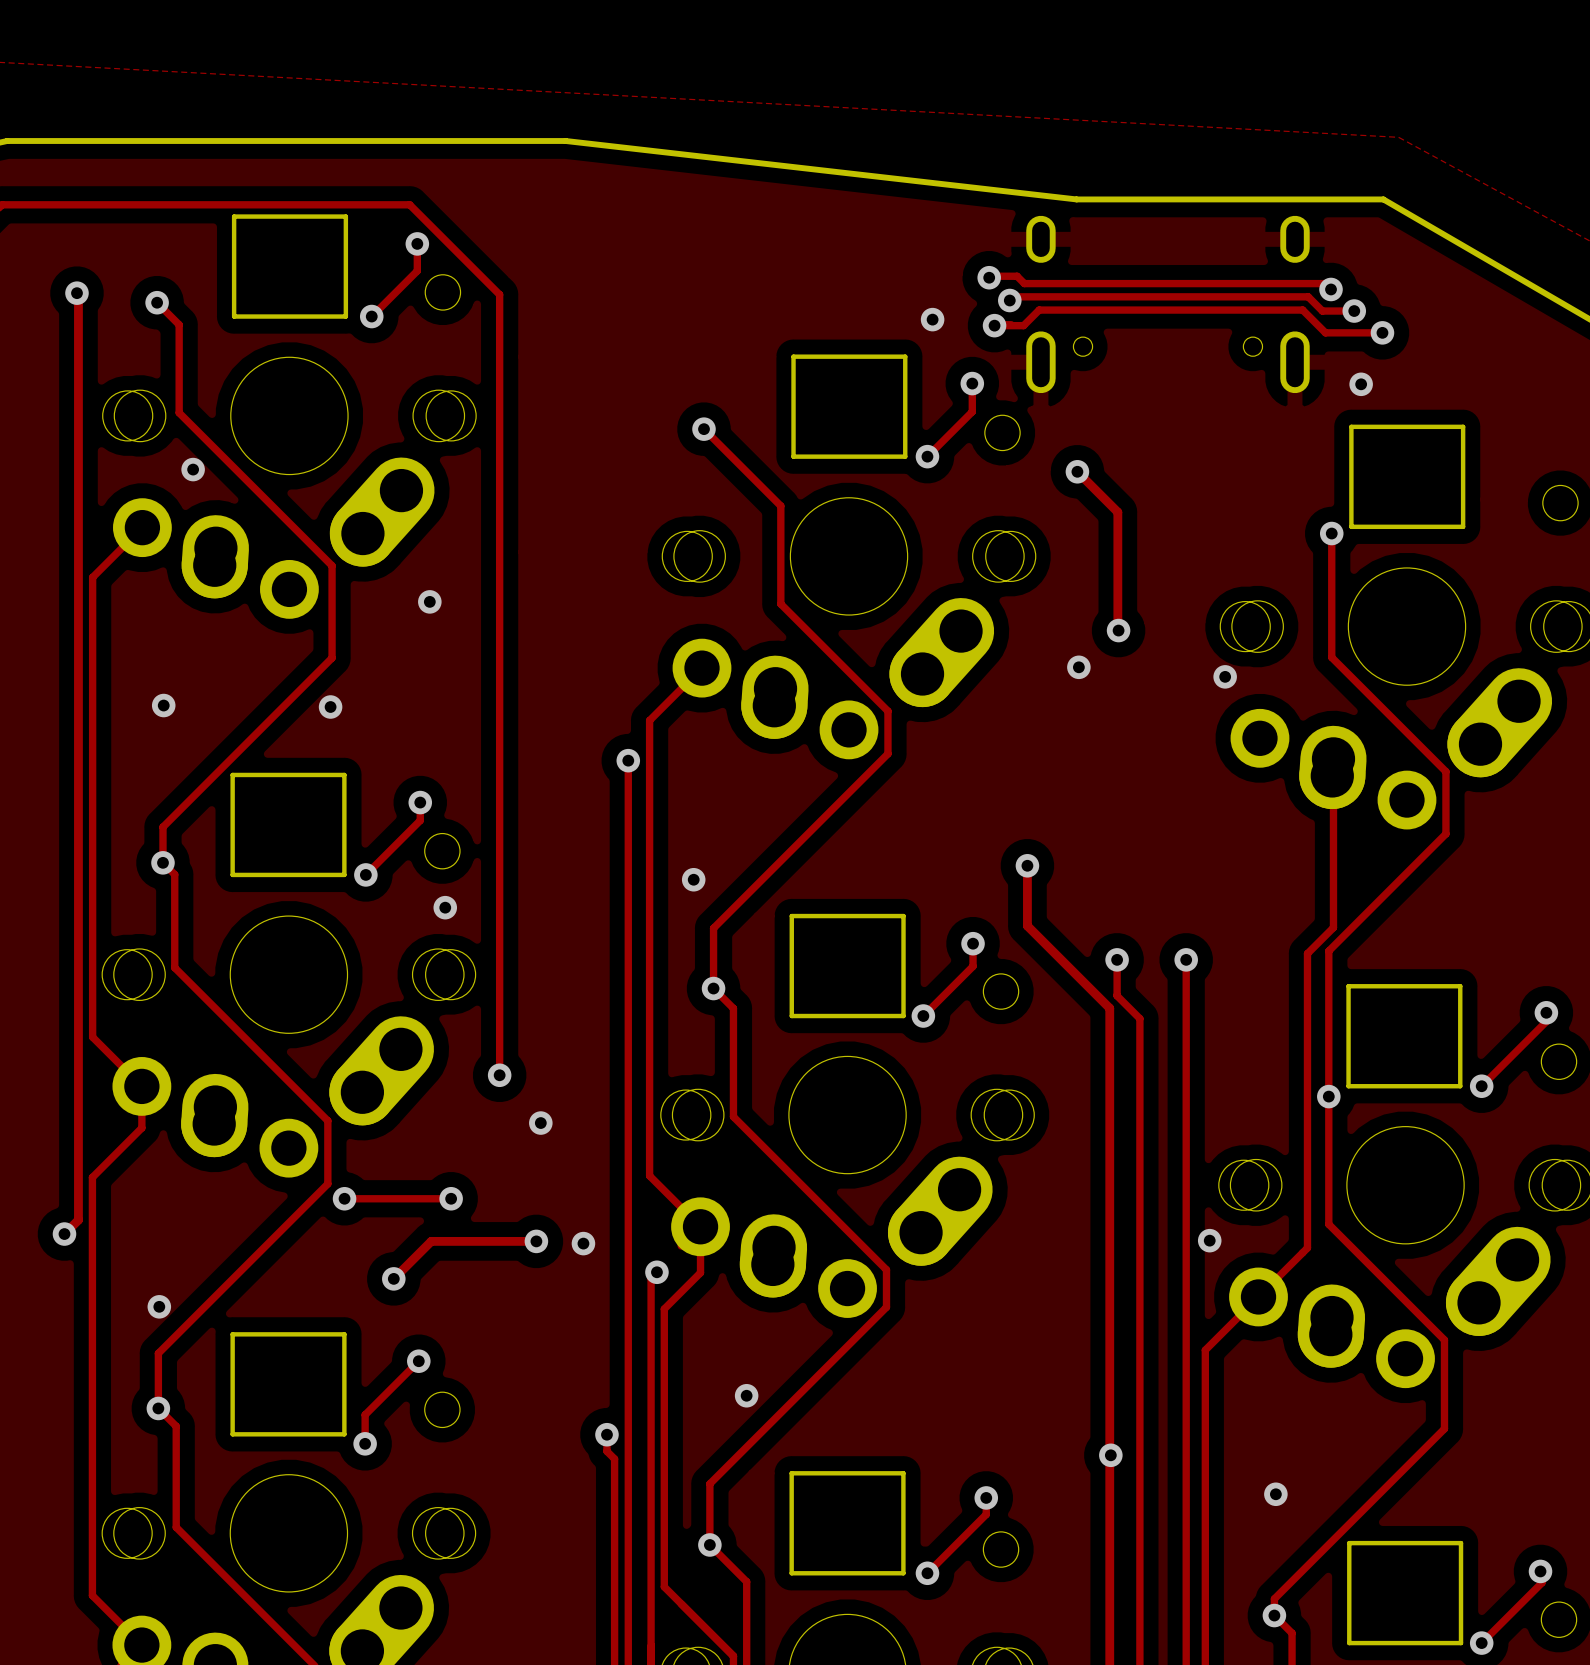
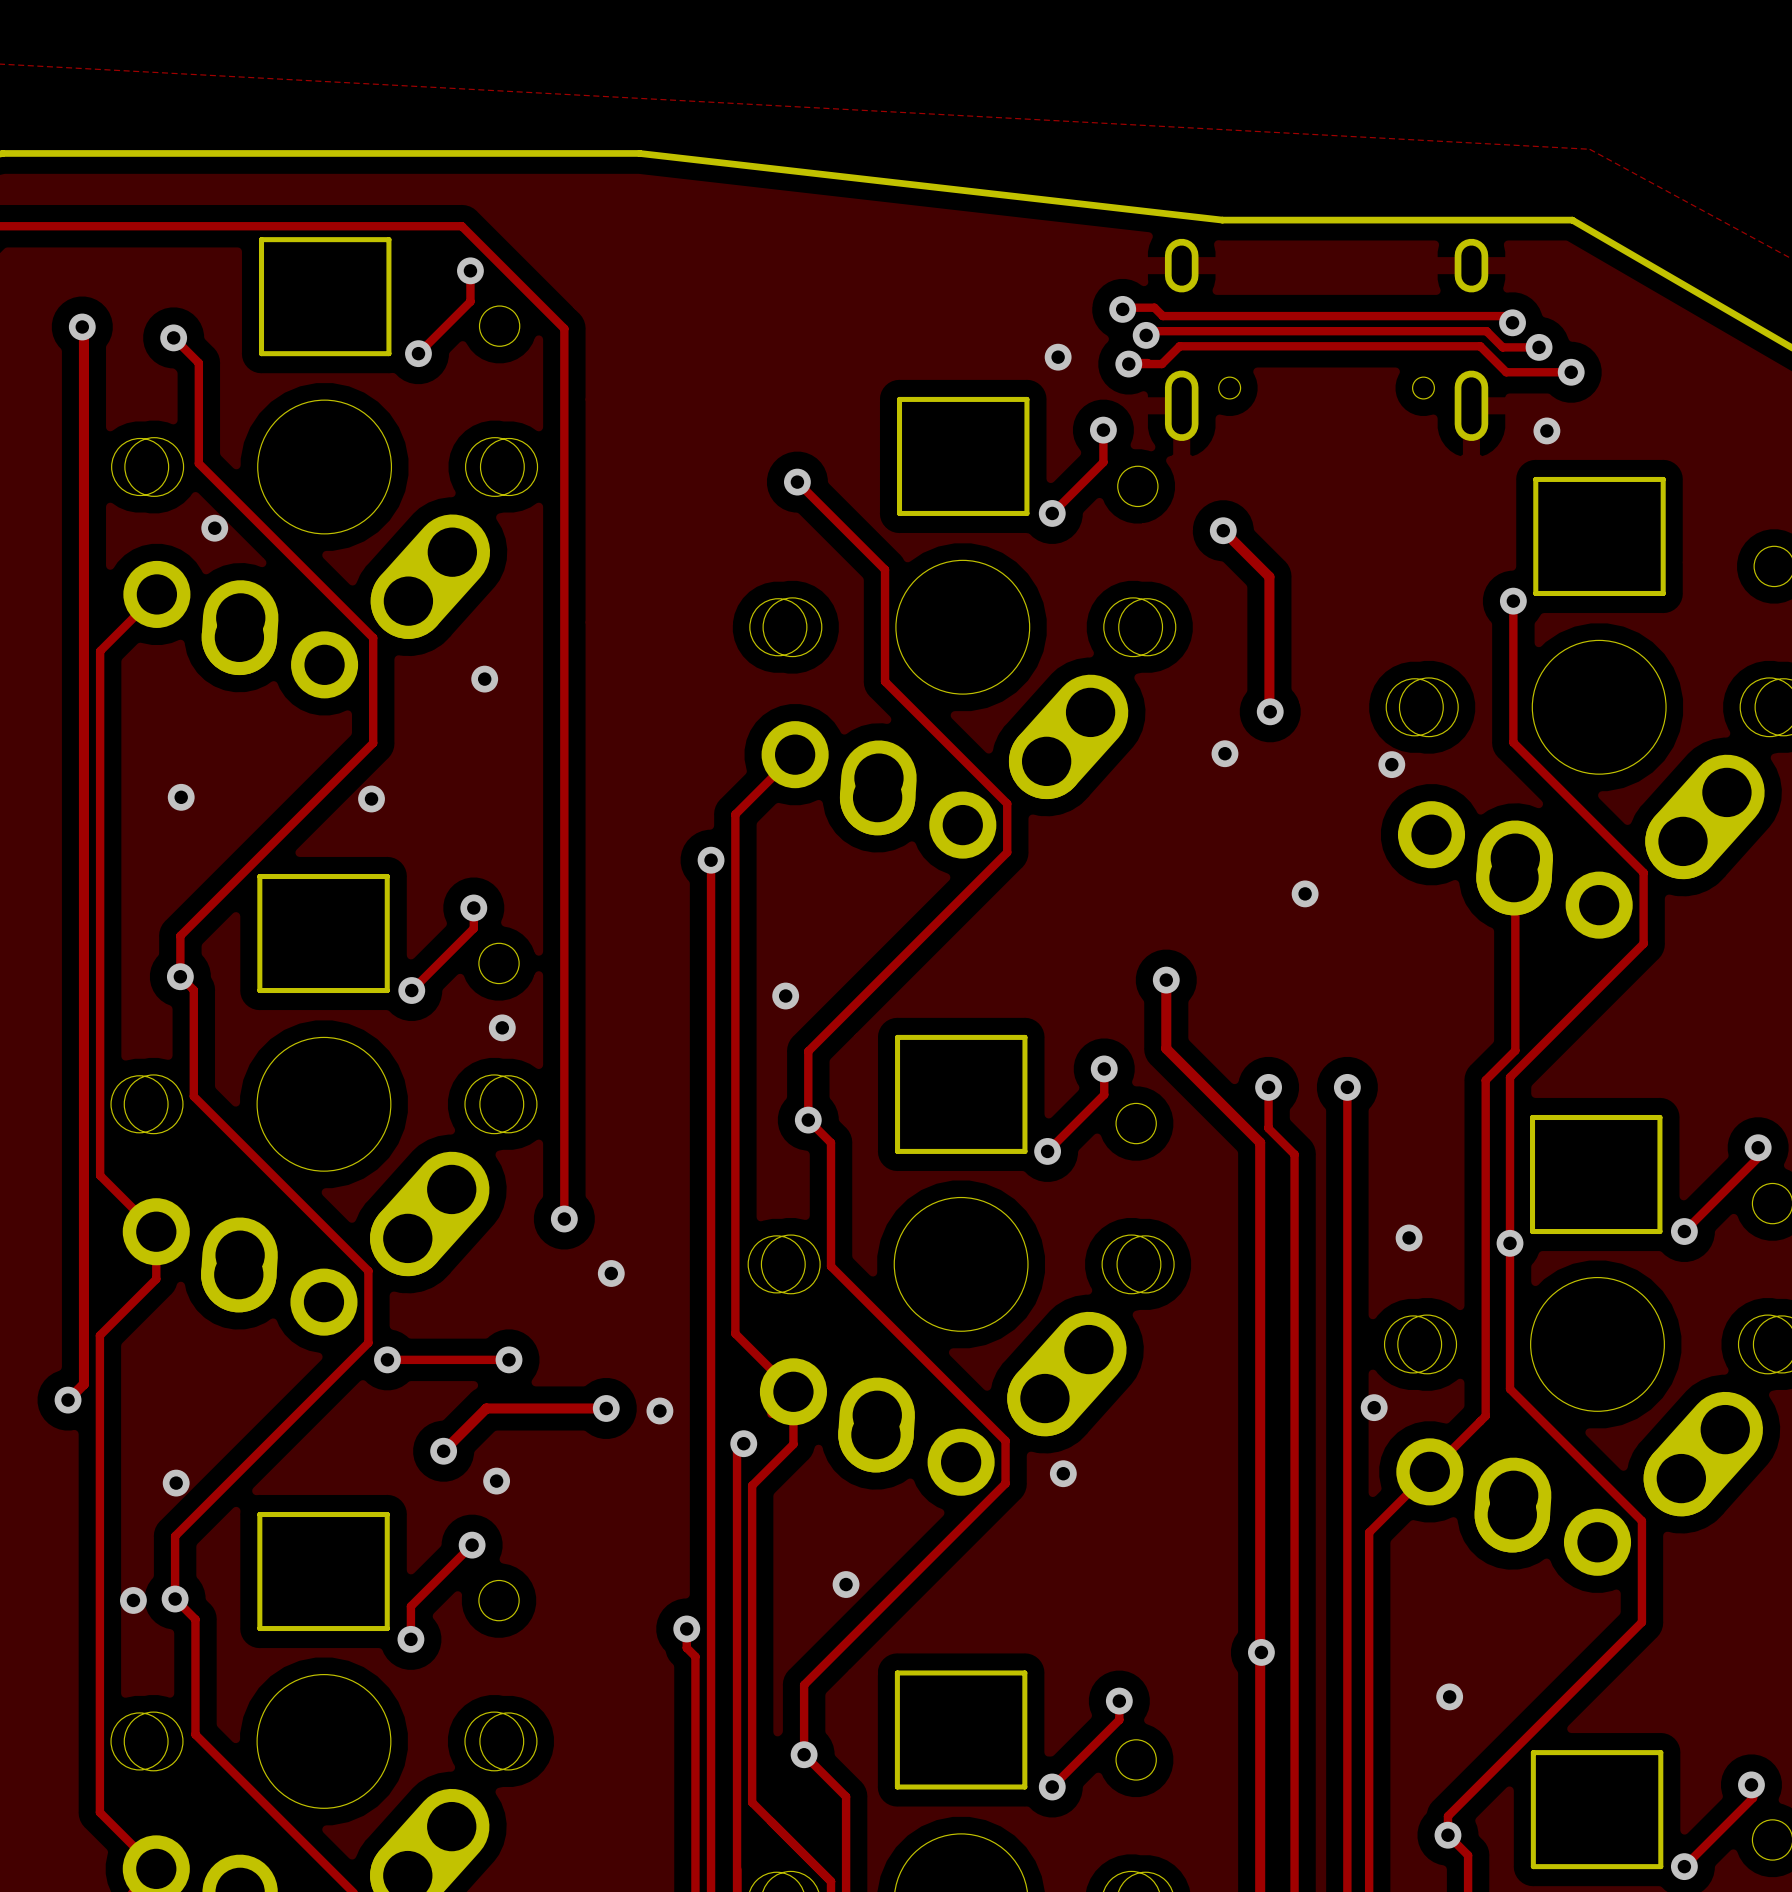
via: none -> (1305, 893)
via: none -> (1409, 1237)
via: none -> (1063, 1473)
via: none -> (496, 1481)
via: none -> (133, 1600)

